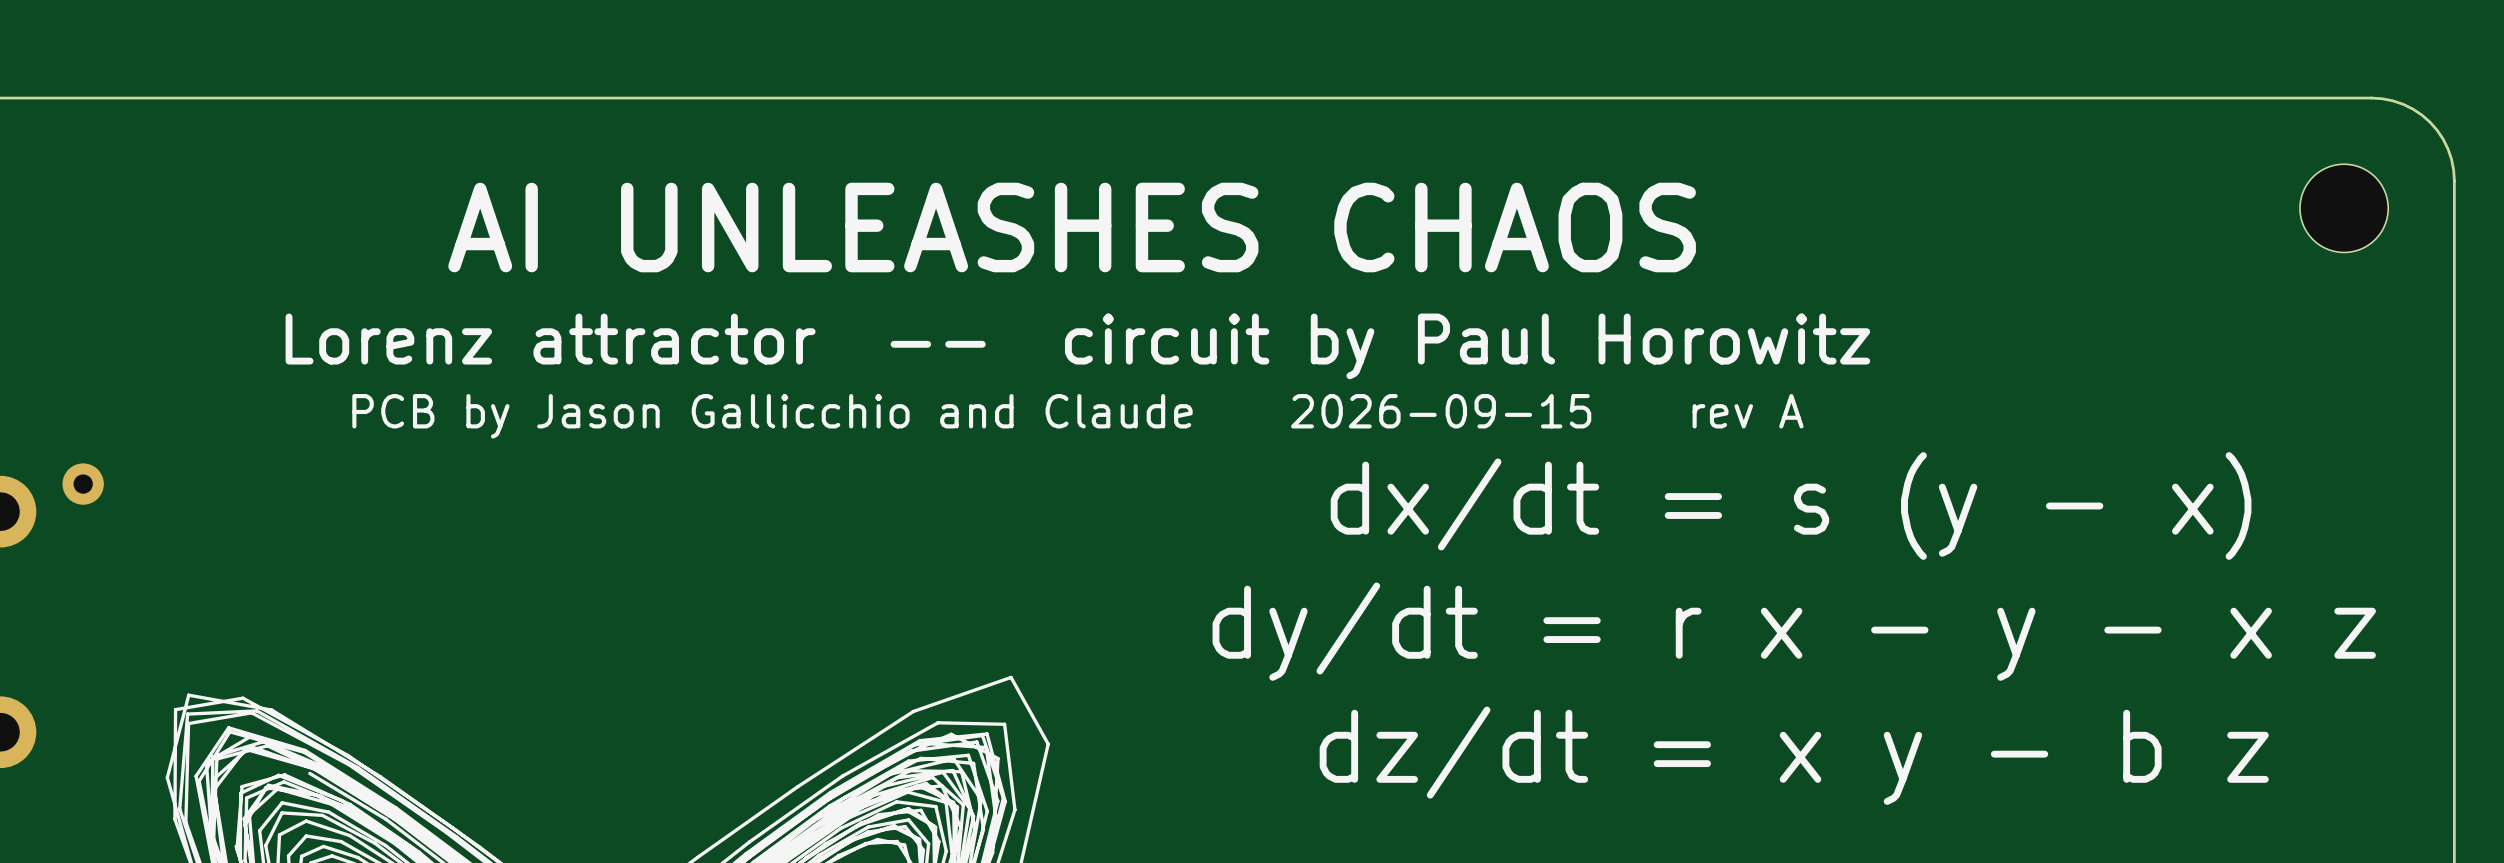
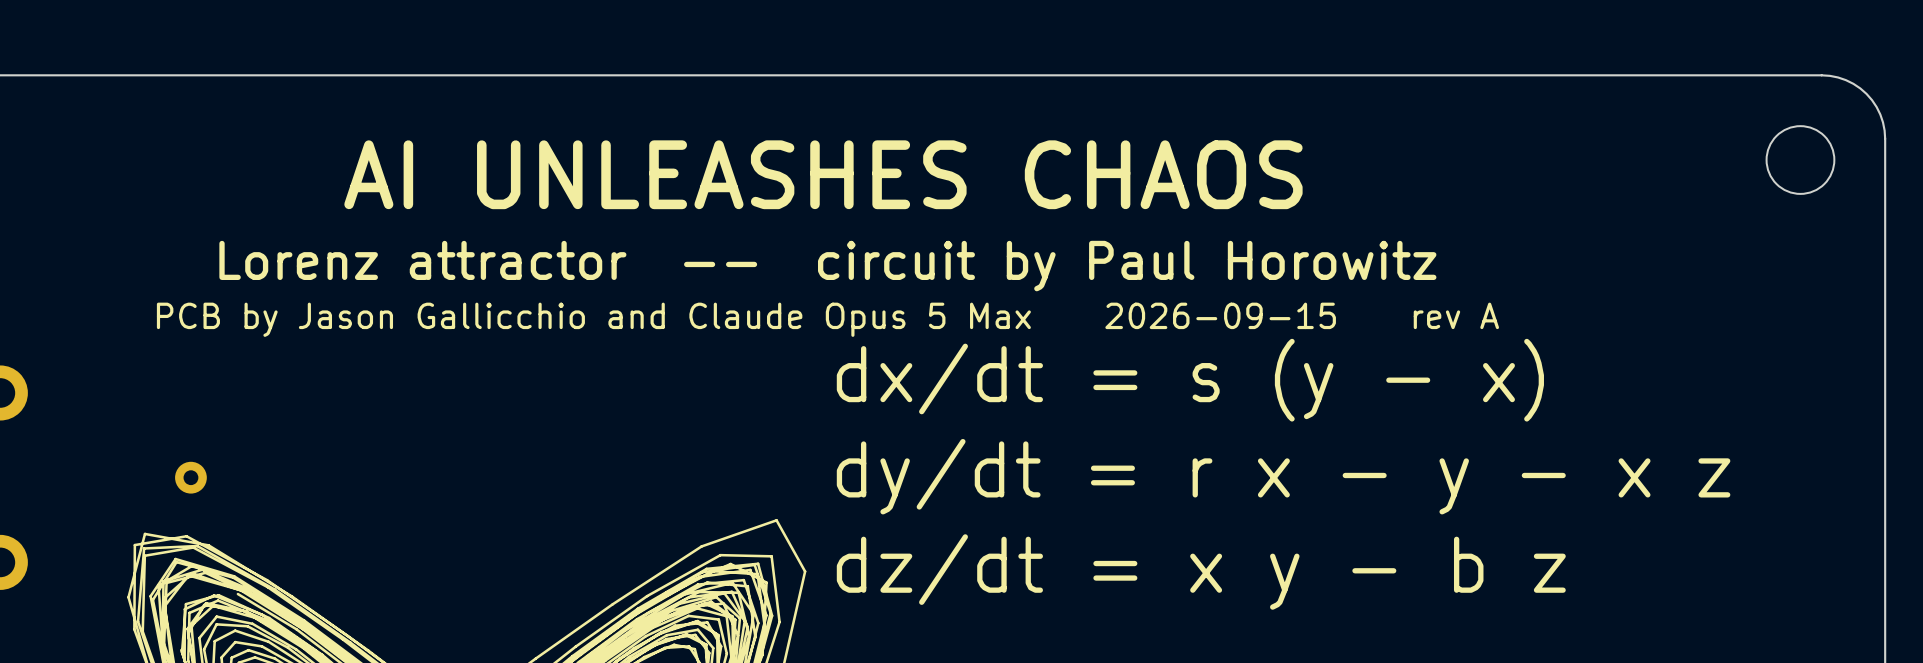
text: PCB by Jason Gallicchio and Claude 2026-09-15 rev A (1077, 416) -> PCB by Jason Gallicchio and Claude Opus 5 Max 2026-09-15 rev A (827, 319)
part position: (83, 484) -> (190, 477)
text: none -> dx/dt = s (y - x) (1190, 380)
text: dx/dt = s (y - x) (1791, 506) -> none
text: none -> dy/dt = r x - y - x z (1283, 476)
text: dy/dt = r x - y - x z (1794, 631) -> none
text: none -> dz/dt = x y - b z (1201, 572)
text: dz/dt = x y - b z (1794, 755) -> none

